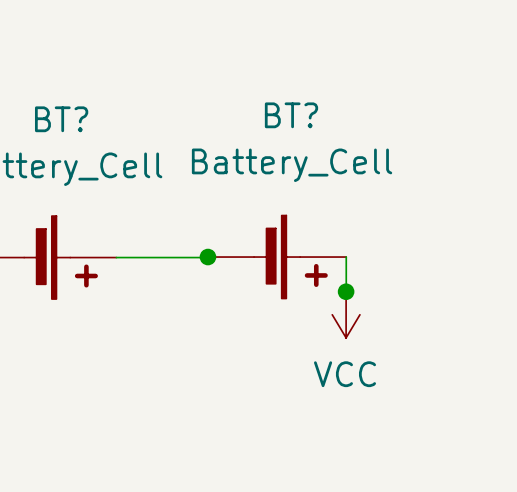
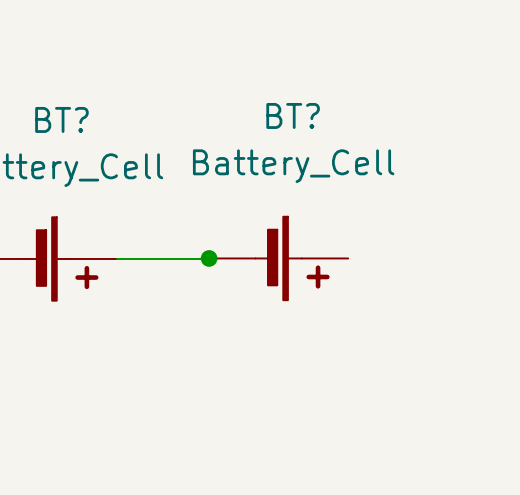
wire: (346, 257) (346, 291) -> none
junction: (346, 291) -> none
power symbol: VCC (346, 314) -> none

